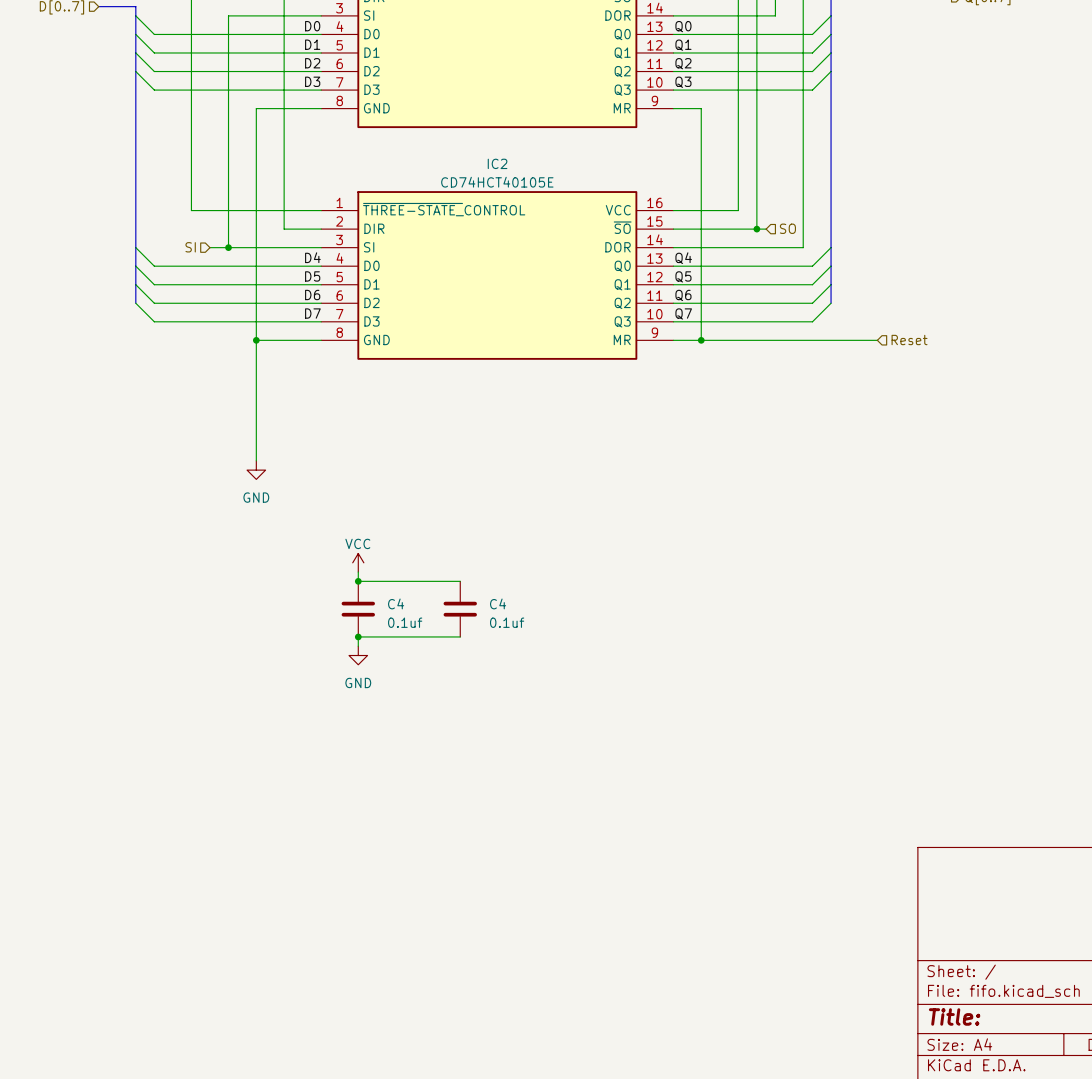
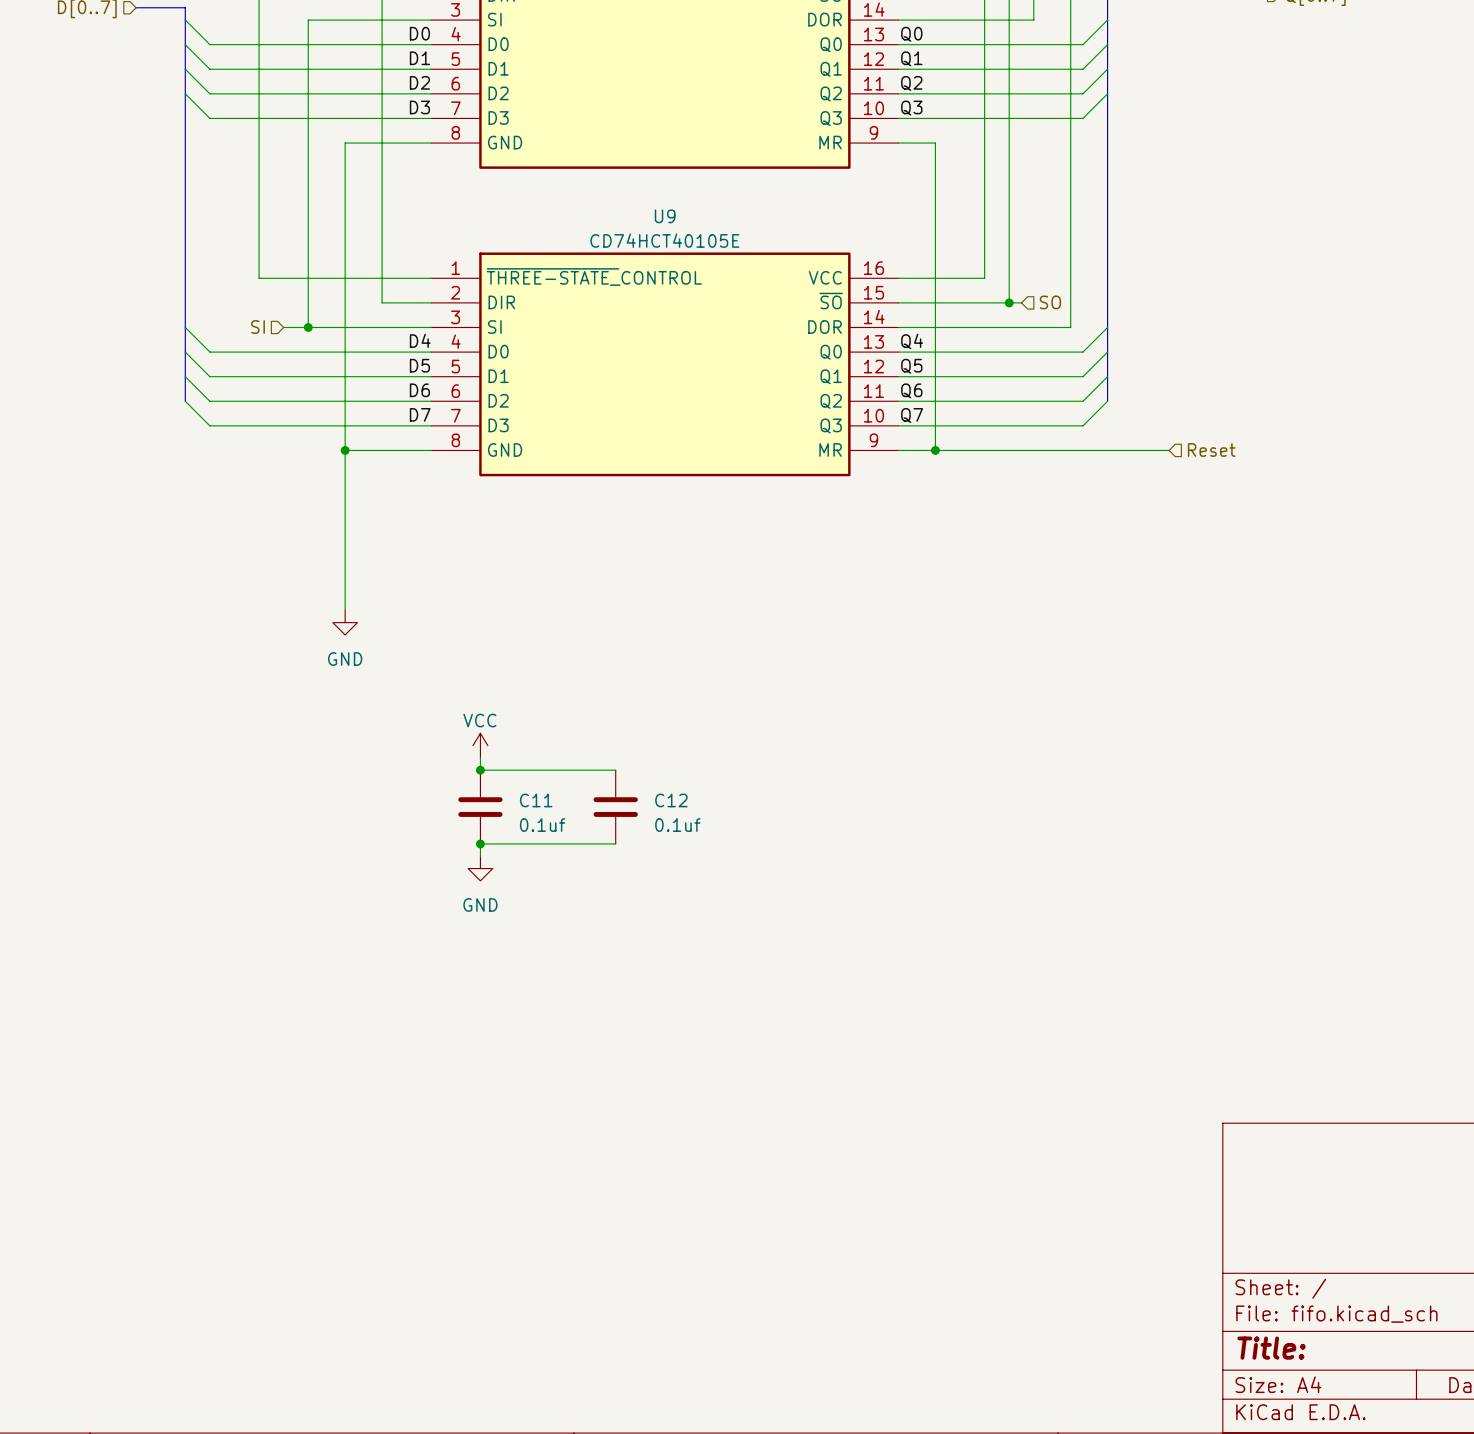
IC2 name: IC2 (497, 163) -> U9 (665, 216)
C4 name: C4 (396, 603) -> C11 (536, 800)
C4 name: C4 (498, 603) -> C12 (671, 800)

